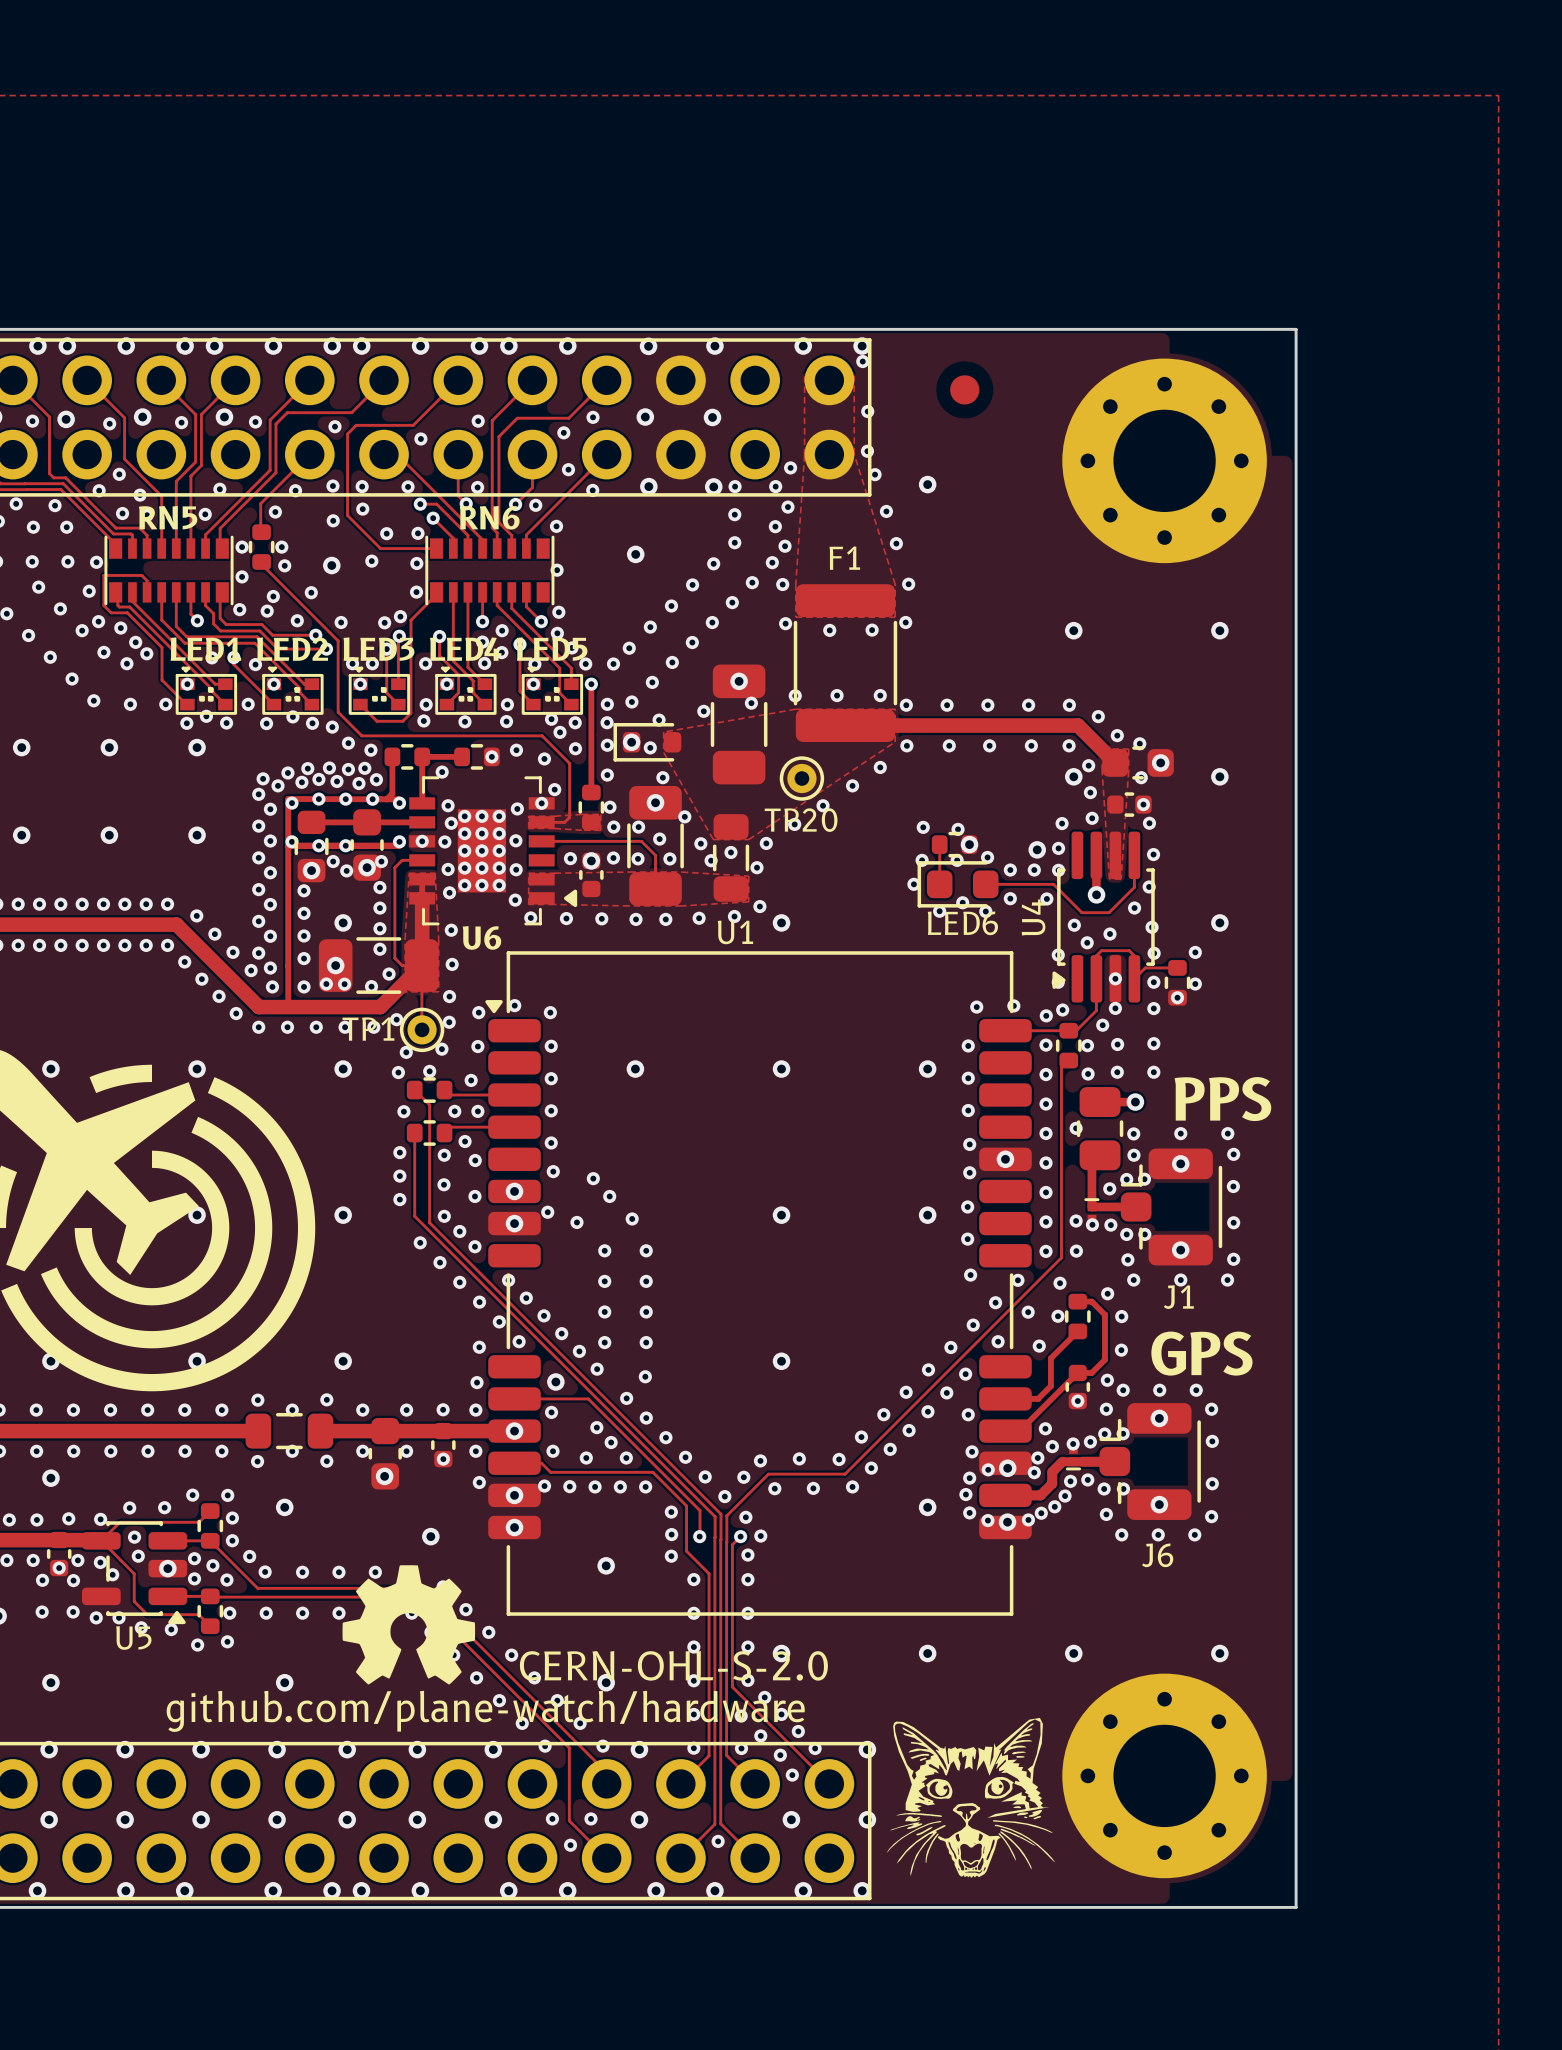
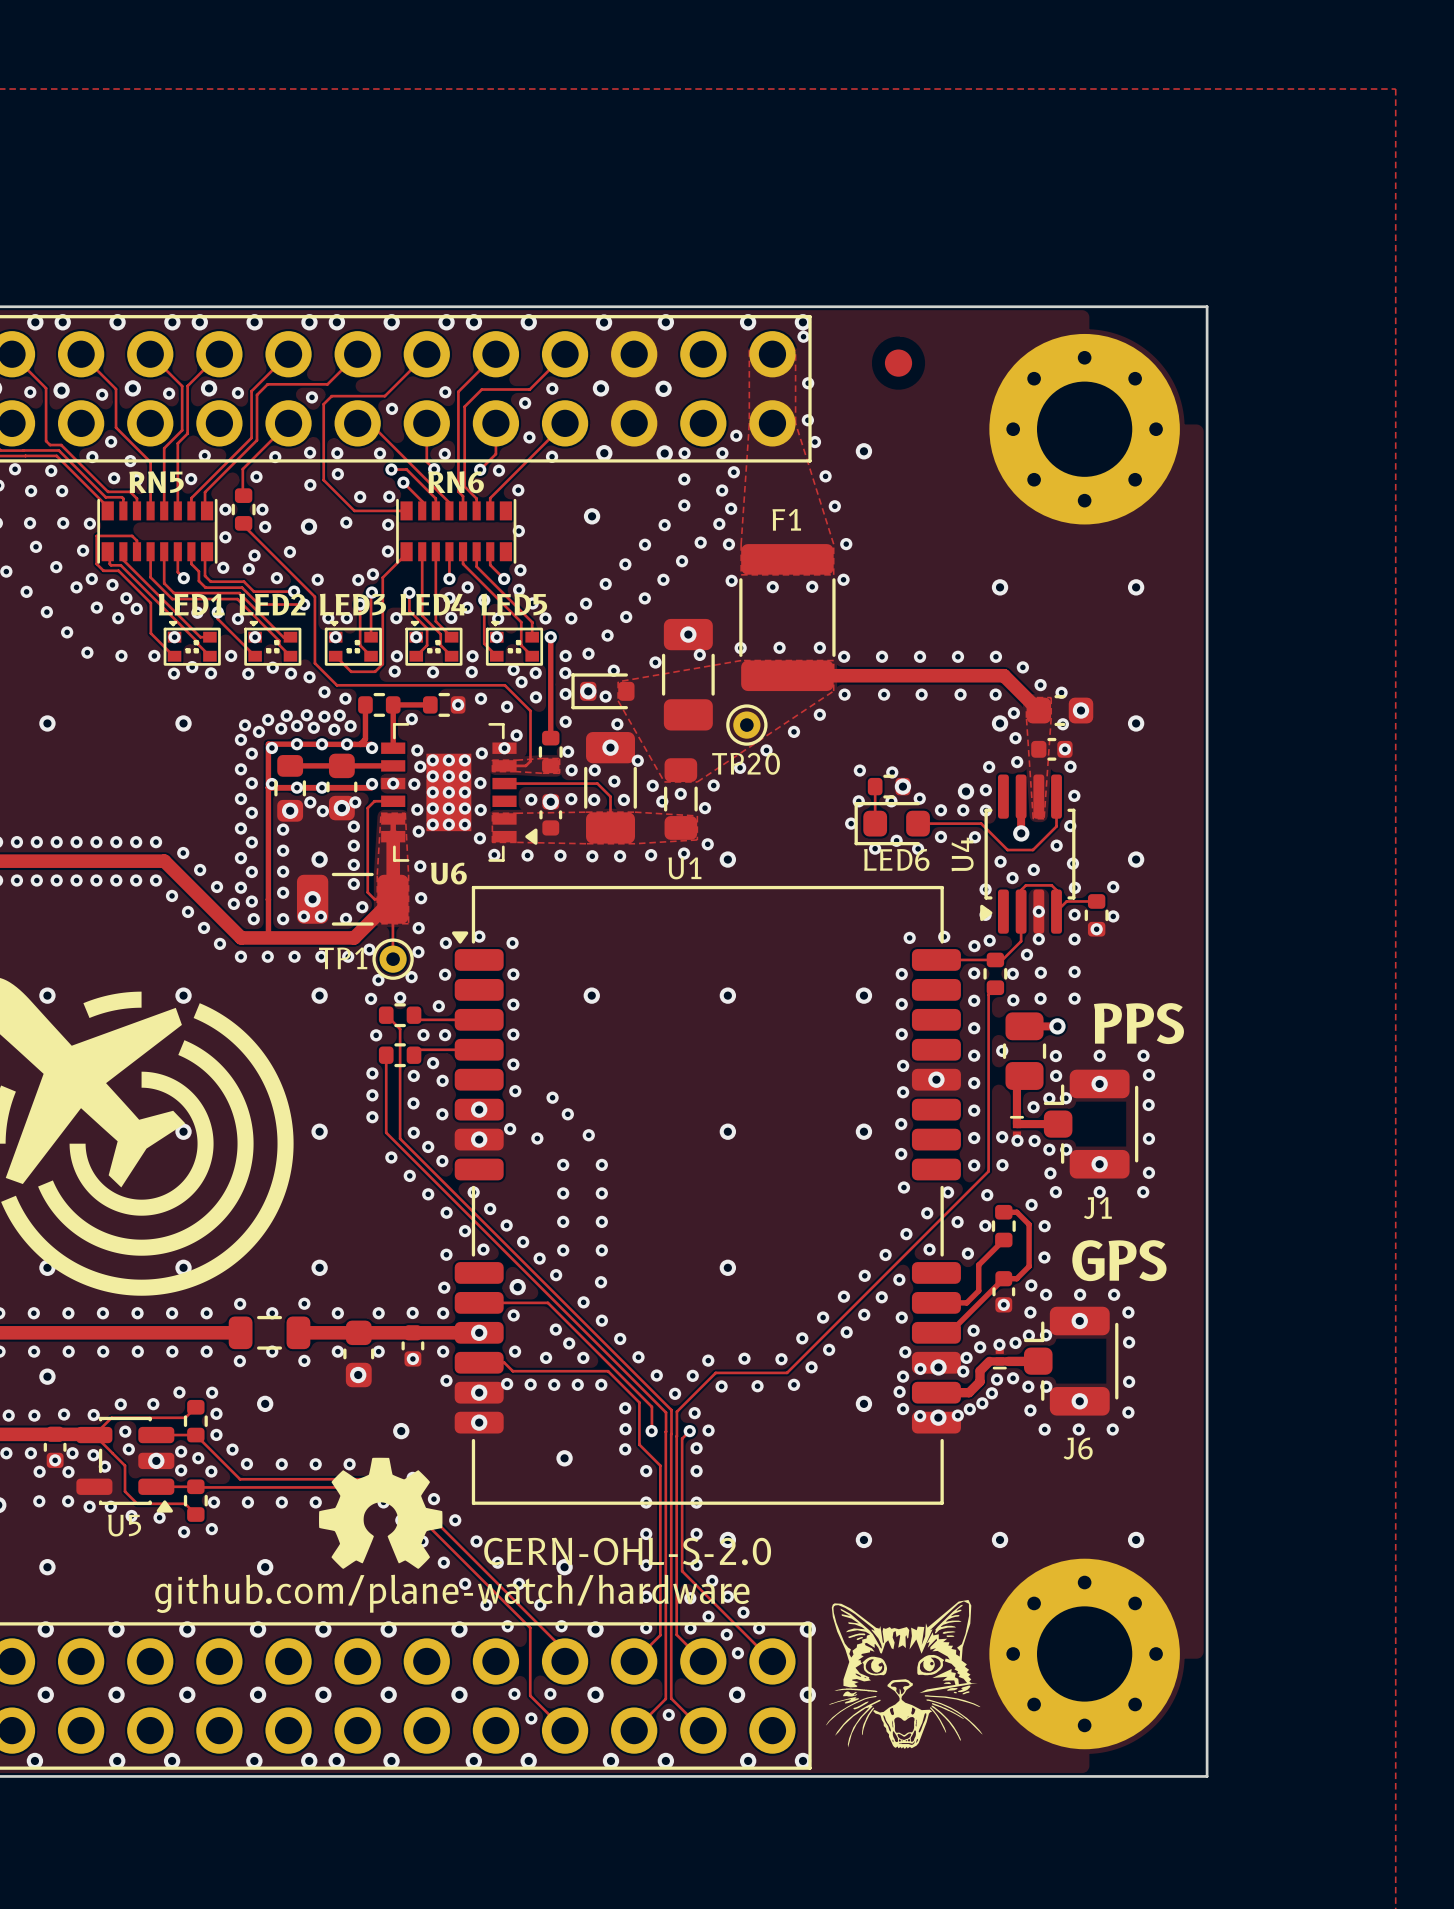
via: (21, 747) -> none
via: (109, 747) -> none
via: (197, 747) -> none
via: none -> (47, 723)
via: none -> (183, 723)
via: (21, 835) -> none
via: (109, 835) -> none
via: (197, 835) -> none

